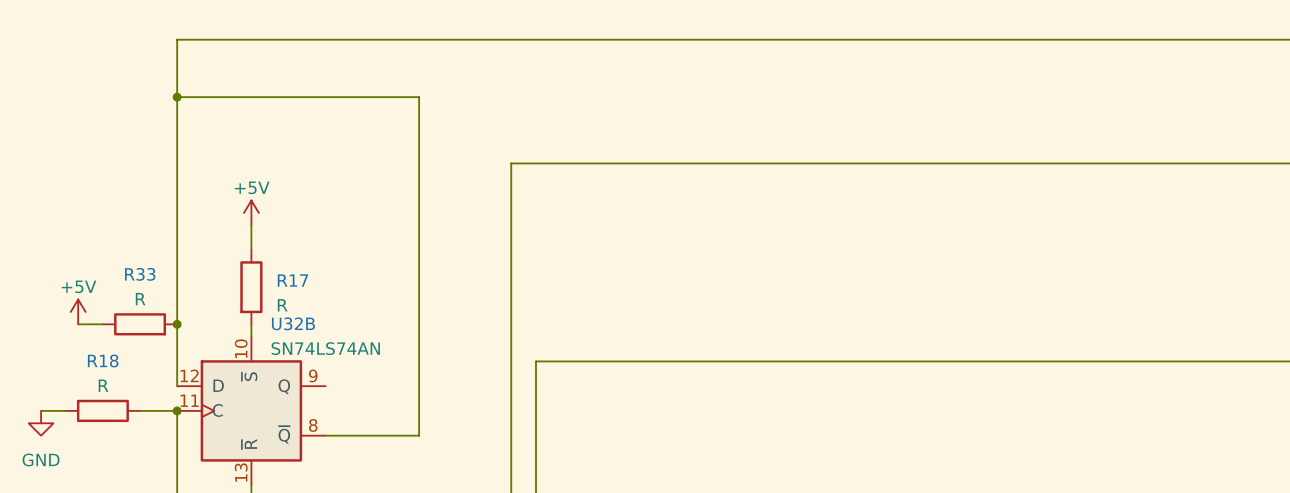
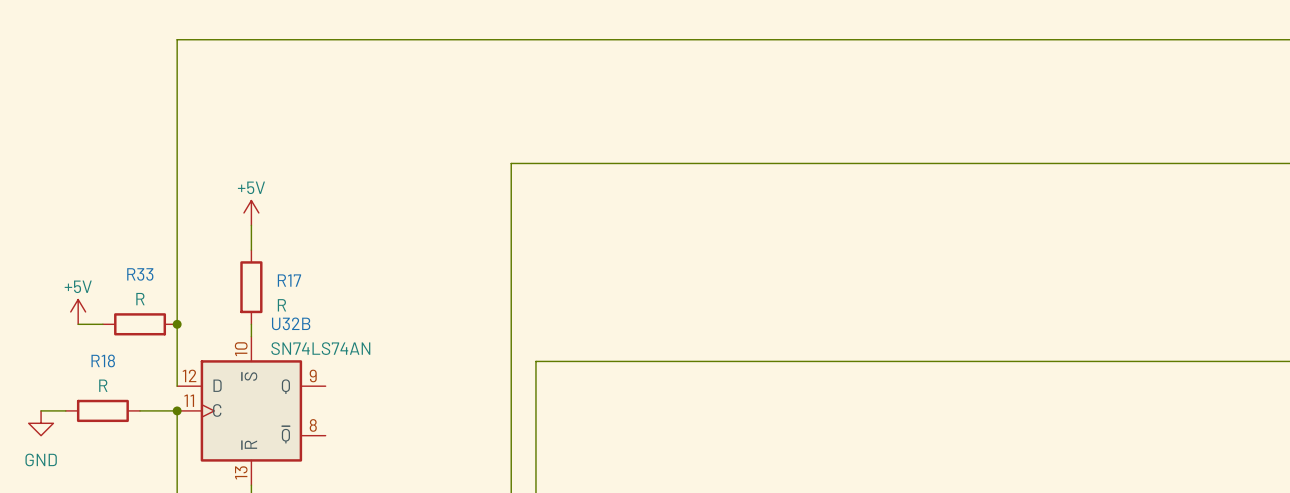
wire: (177, 97) (419, 97) (419, 435) (325, 435) -> none
junction: (177, 97) -> none

